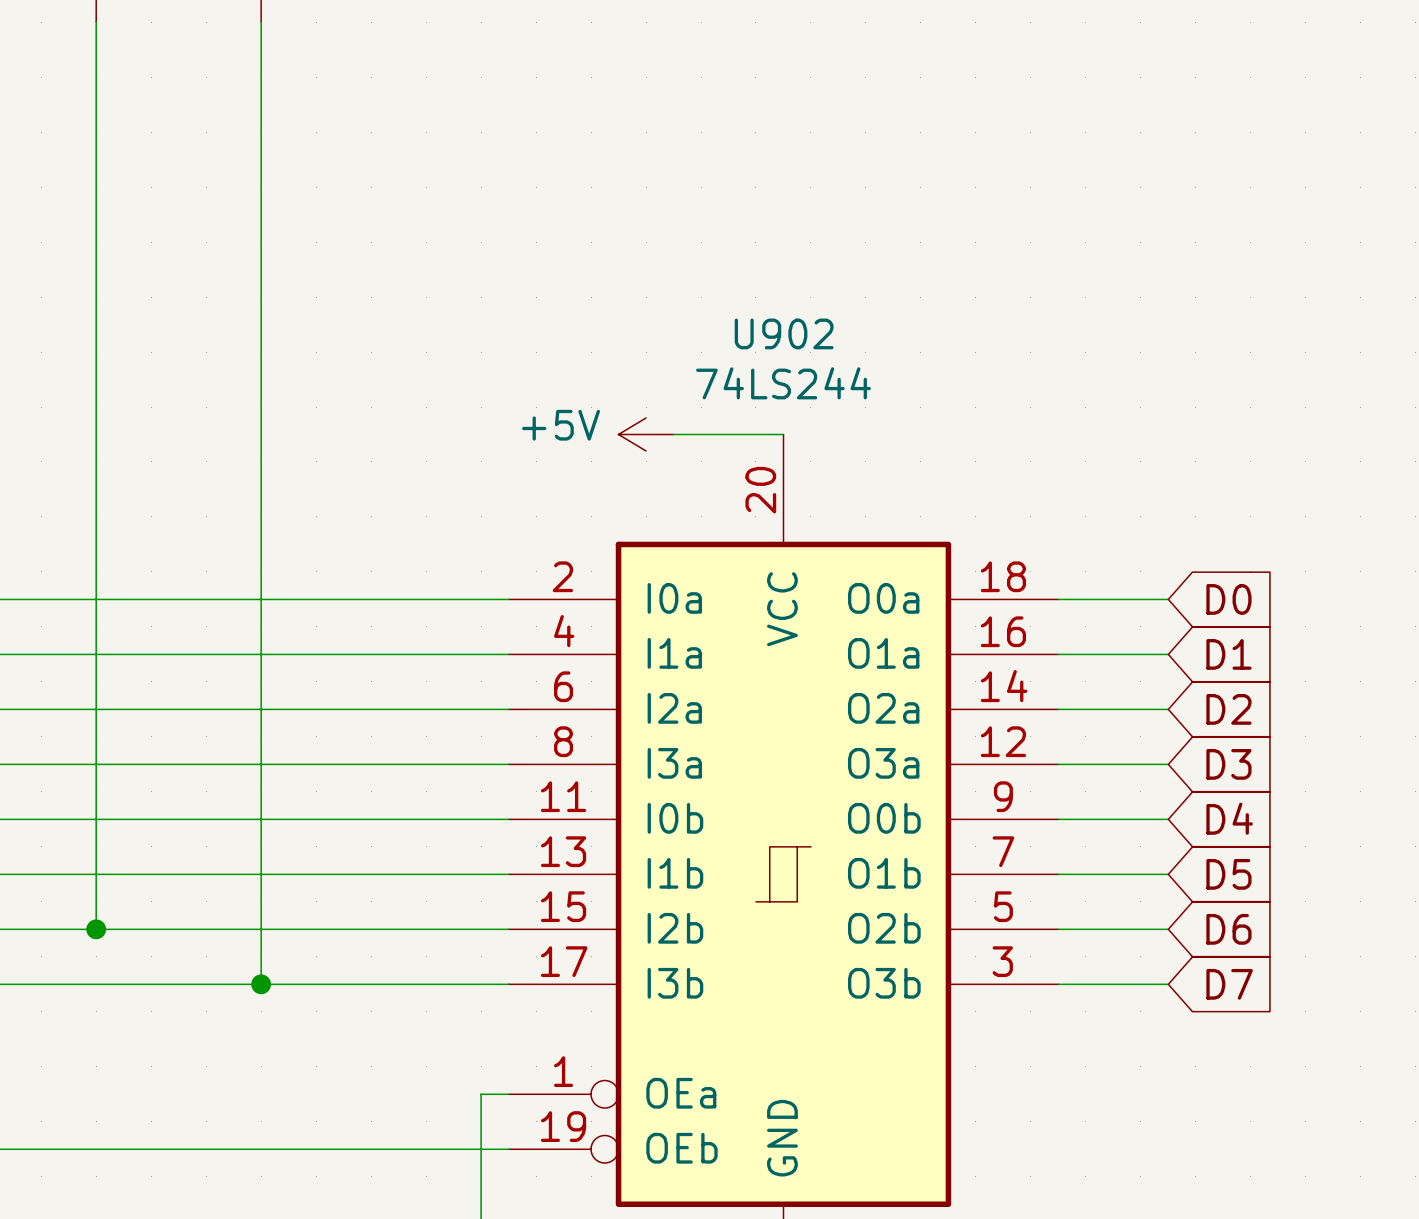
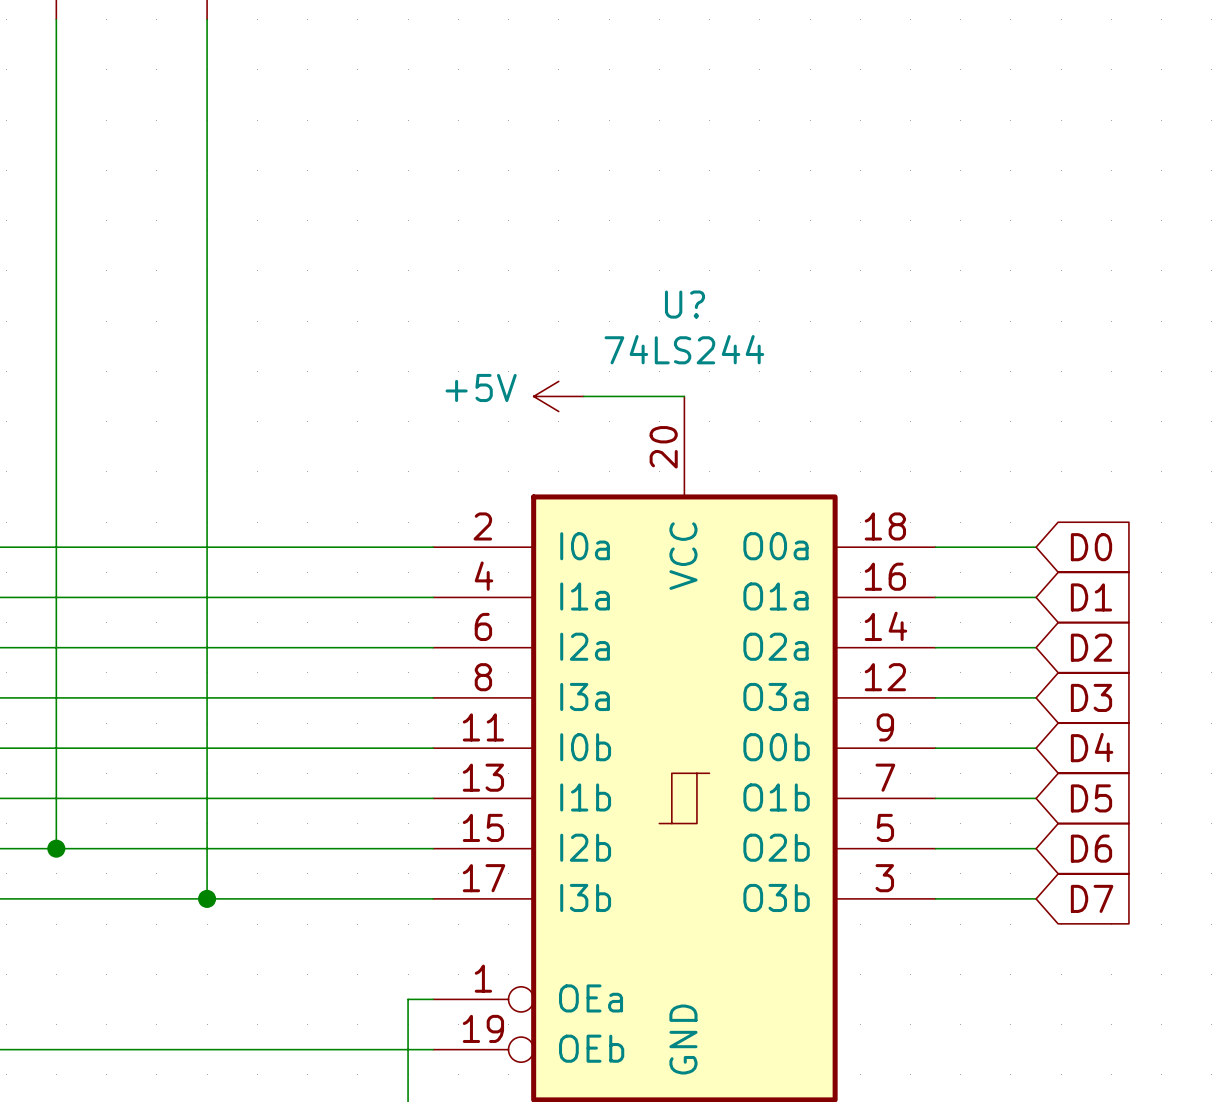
U902 name: U902 (784, 333) -> U? (684, 304)

